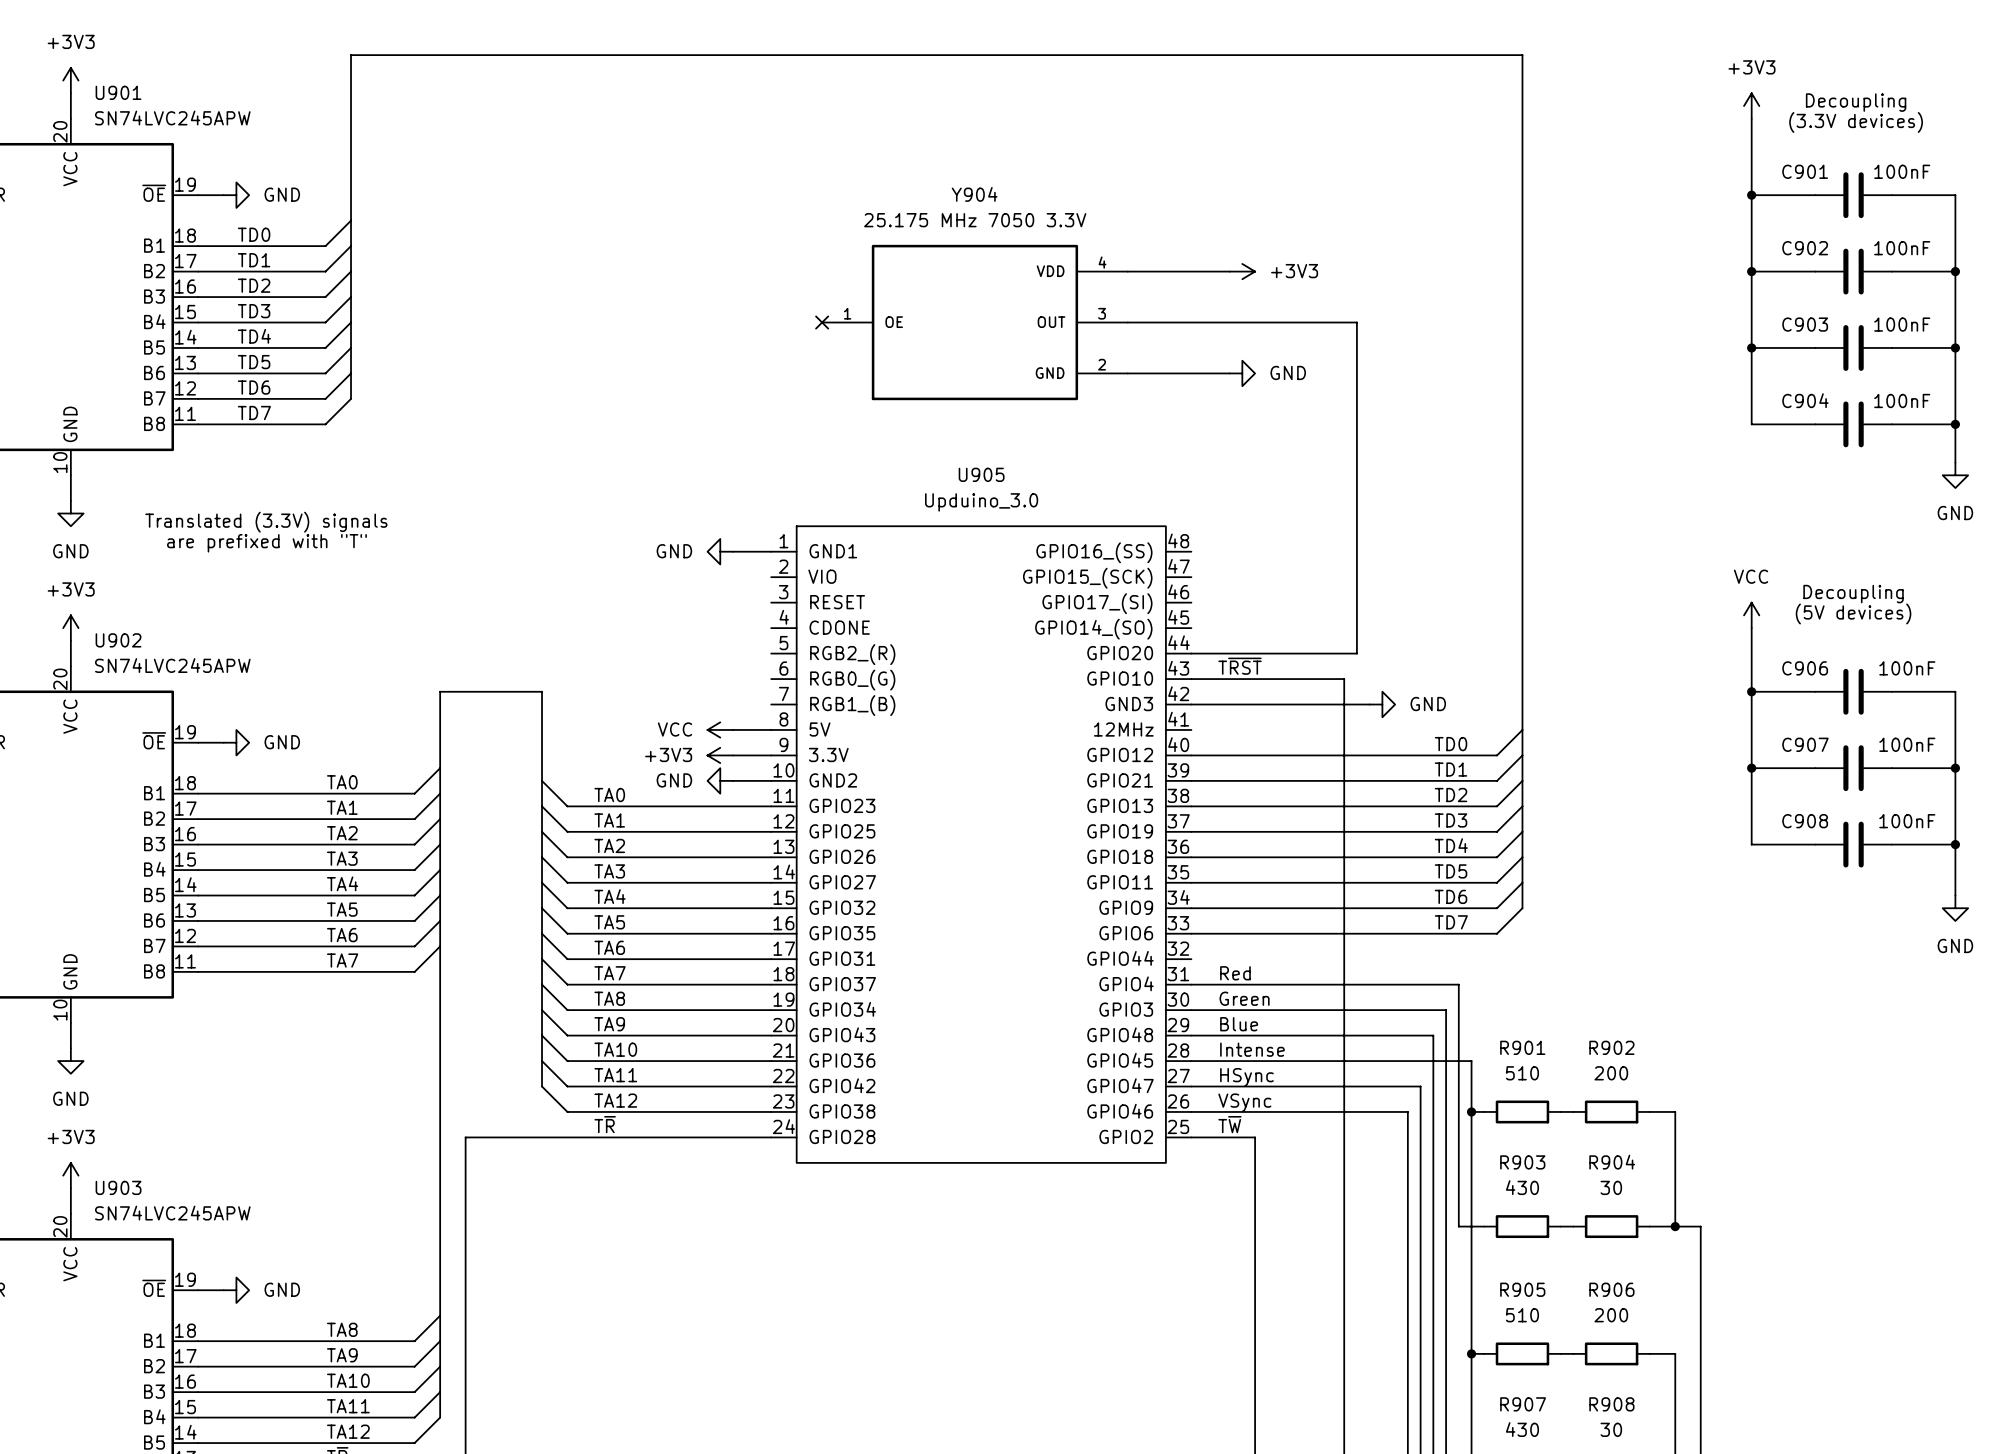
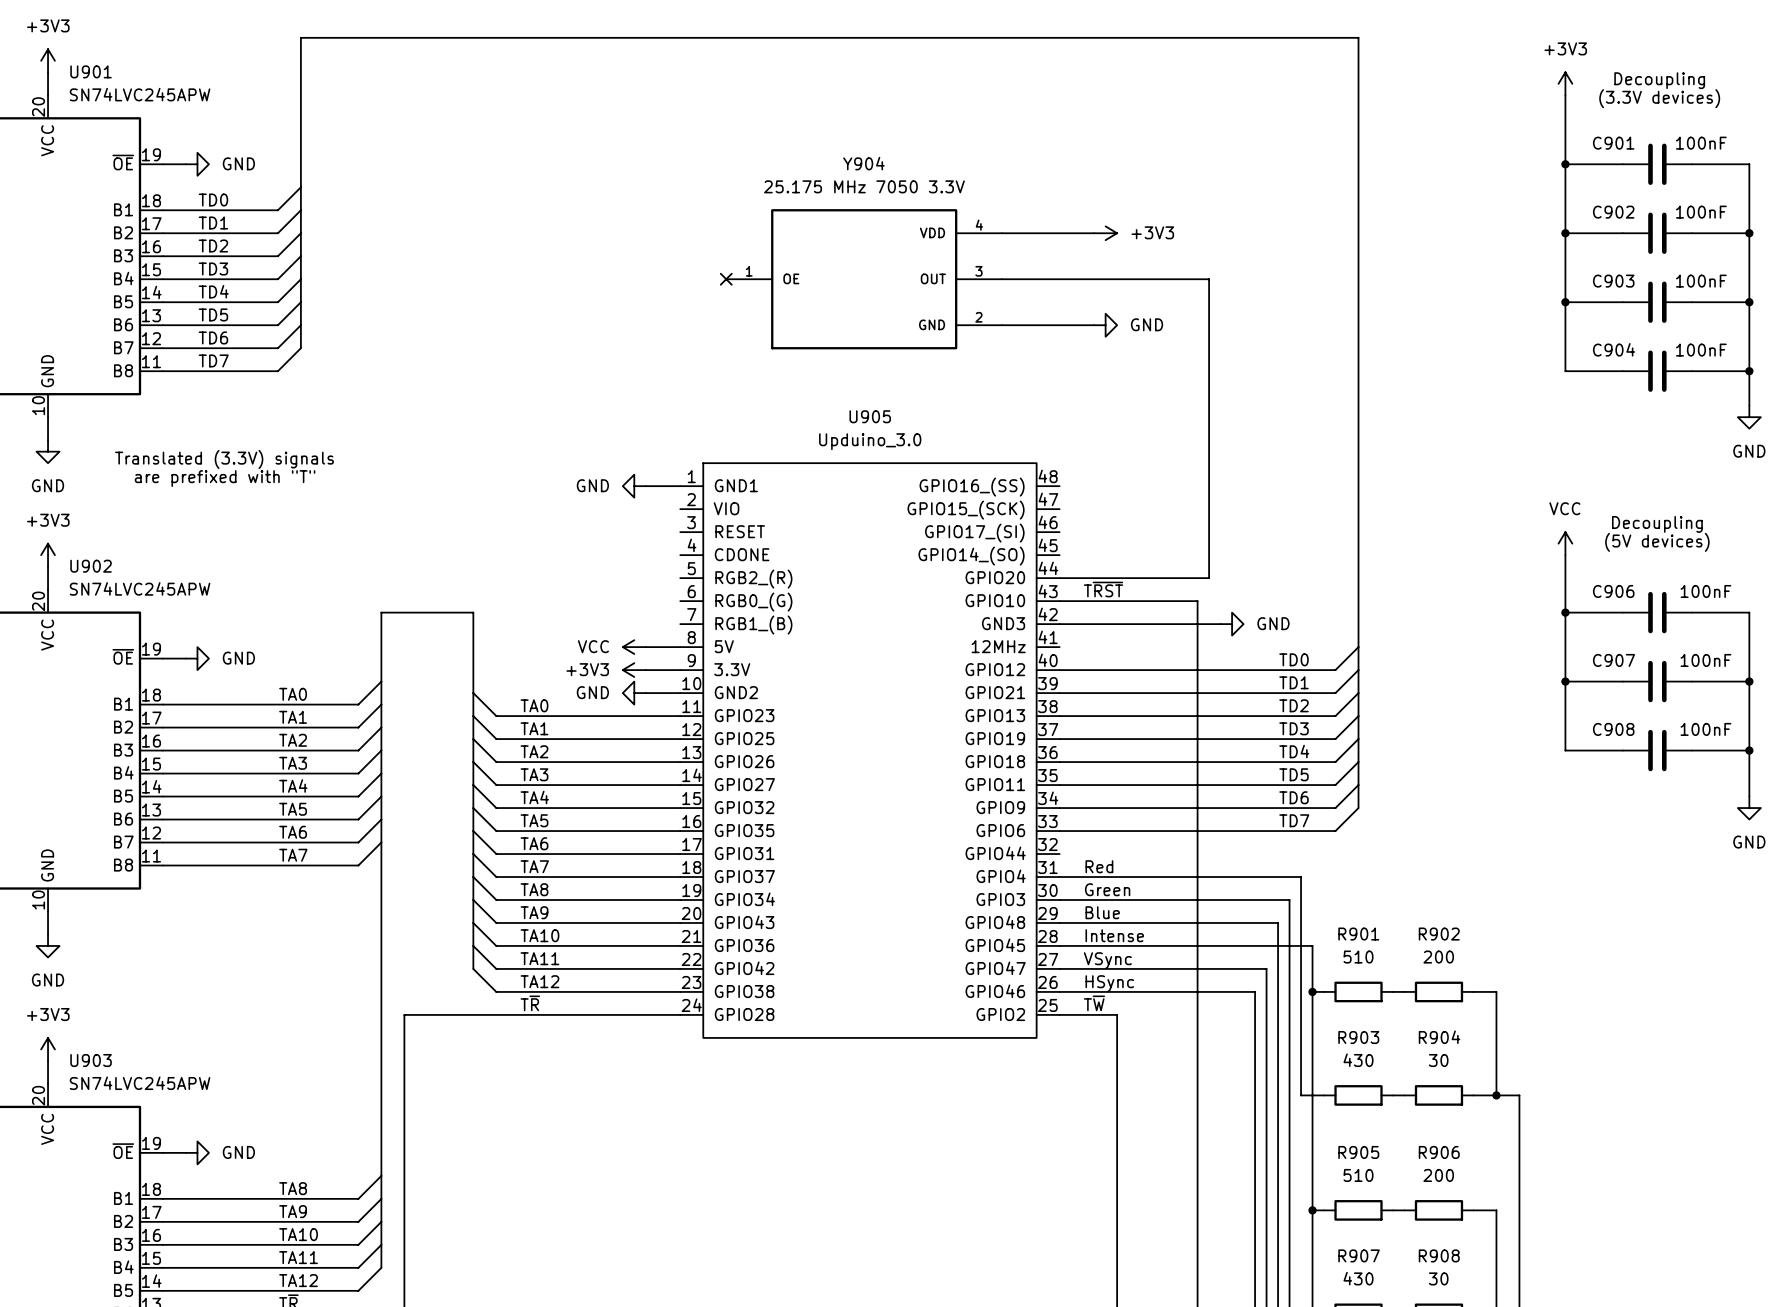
label: HSync (1246, 1077) -> VSync (1107, 960)
label: VSync (1244, 1102) -> HSync (1109, 983)

